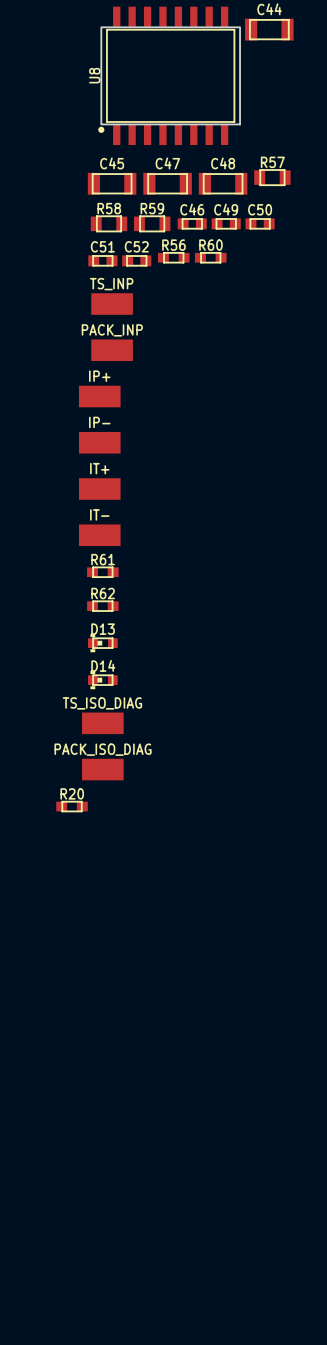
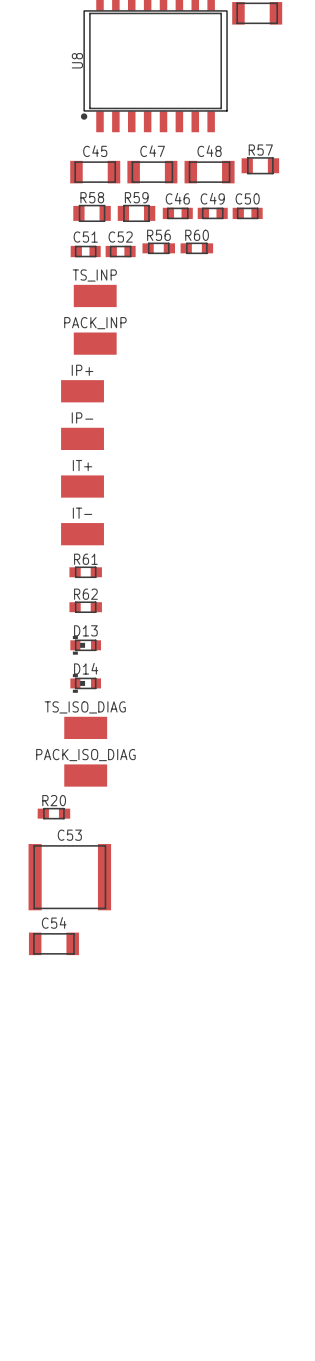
C53: none -> (69, 877)
C54: none -> (53, 943)

